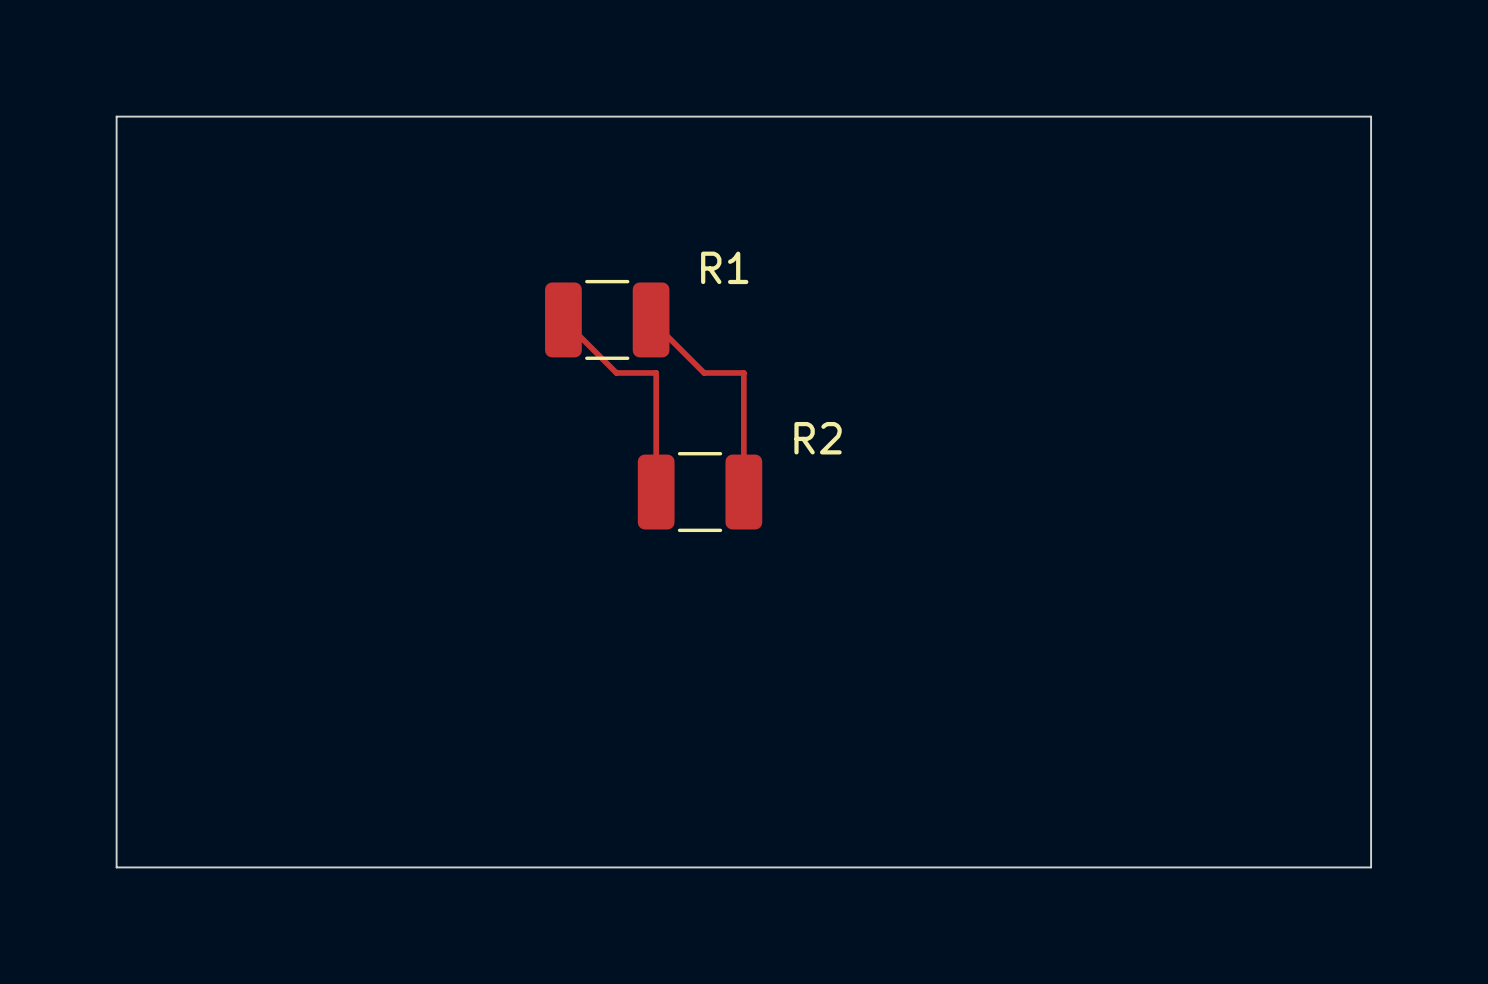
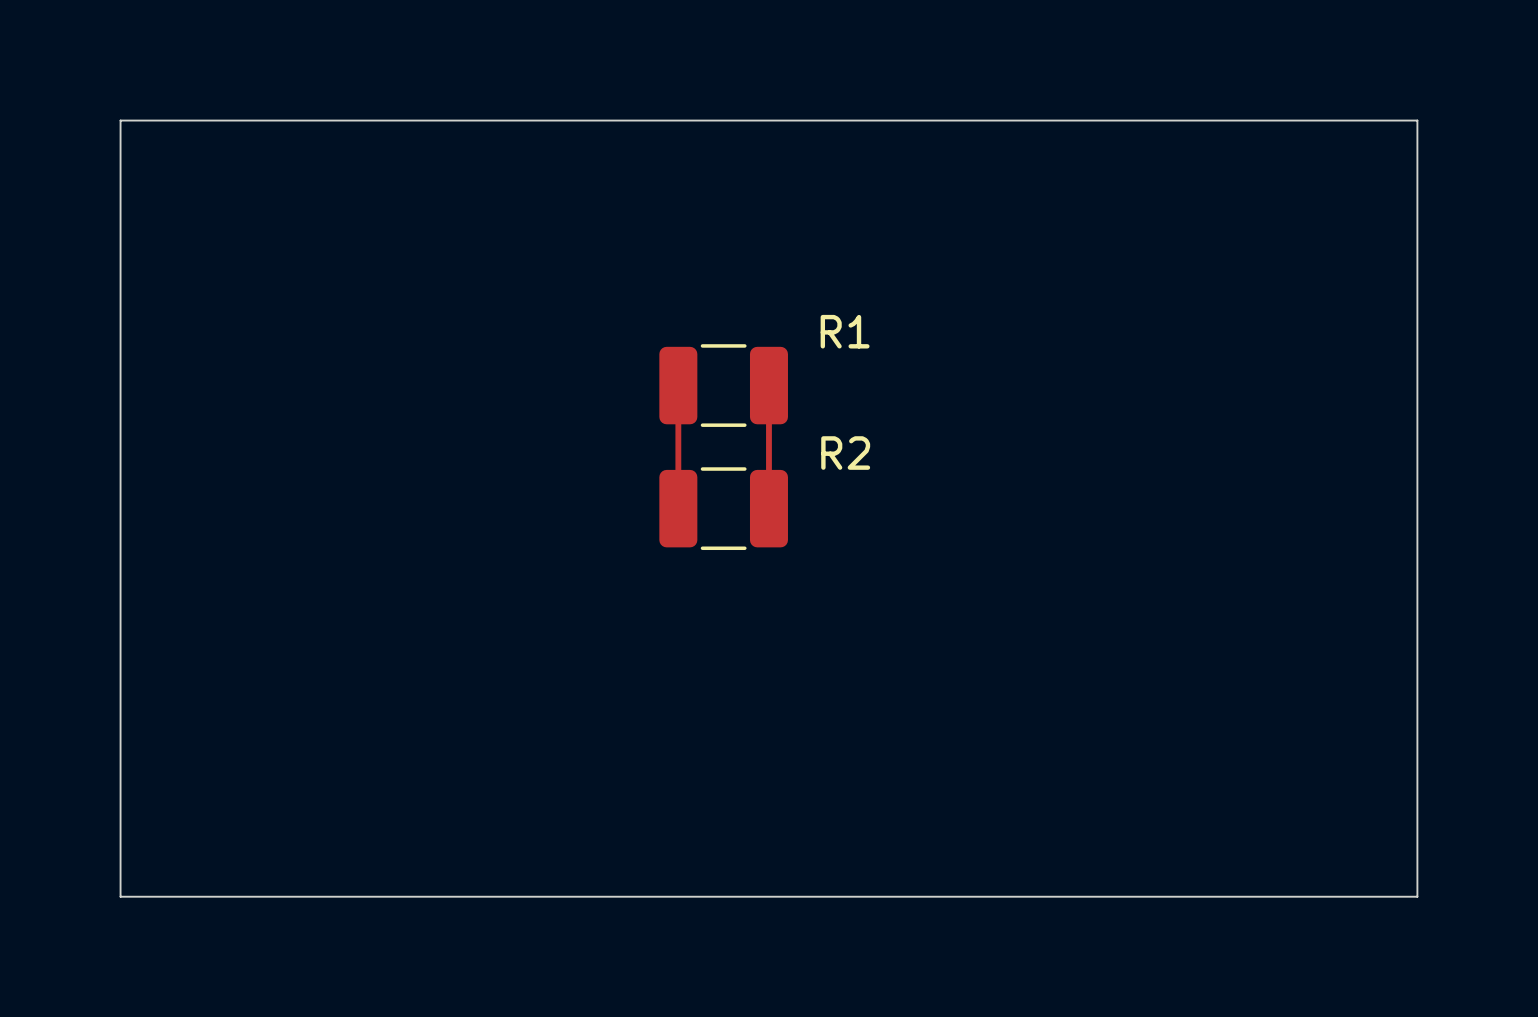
track: (563, 319) (616, 372) (656, 372) -> none
R1 position: (607, 319) -> (723, 385)
track: (651, 319) (704, 372) (743, 372) -> none

